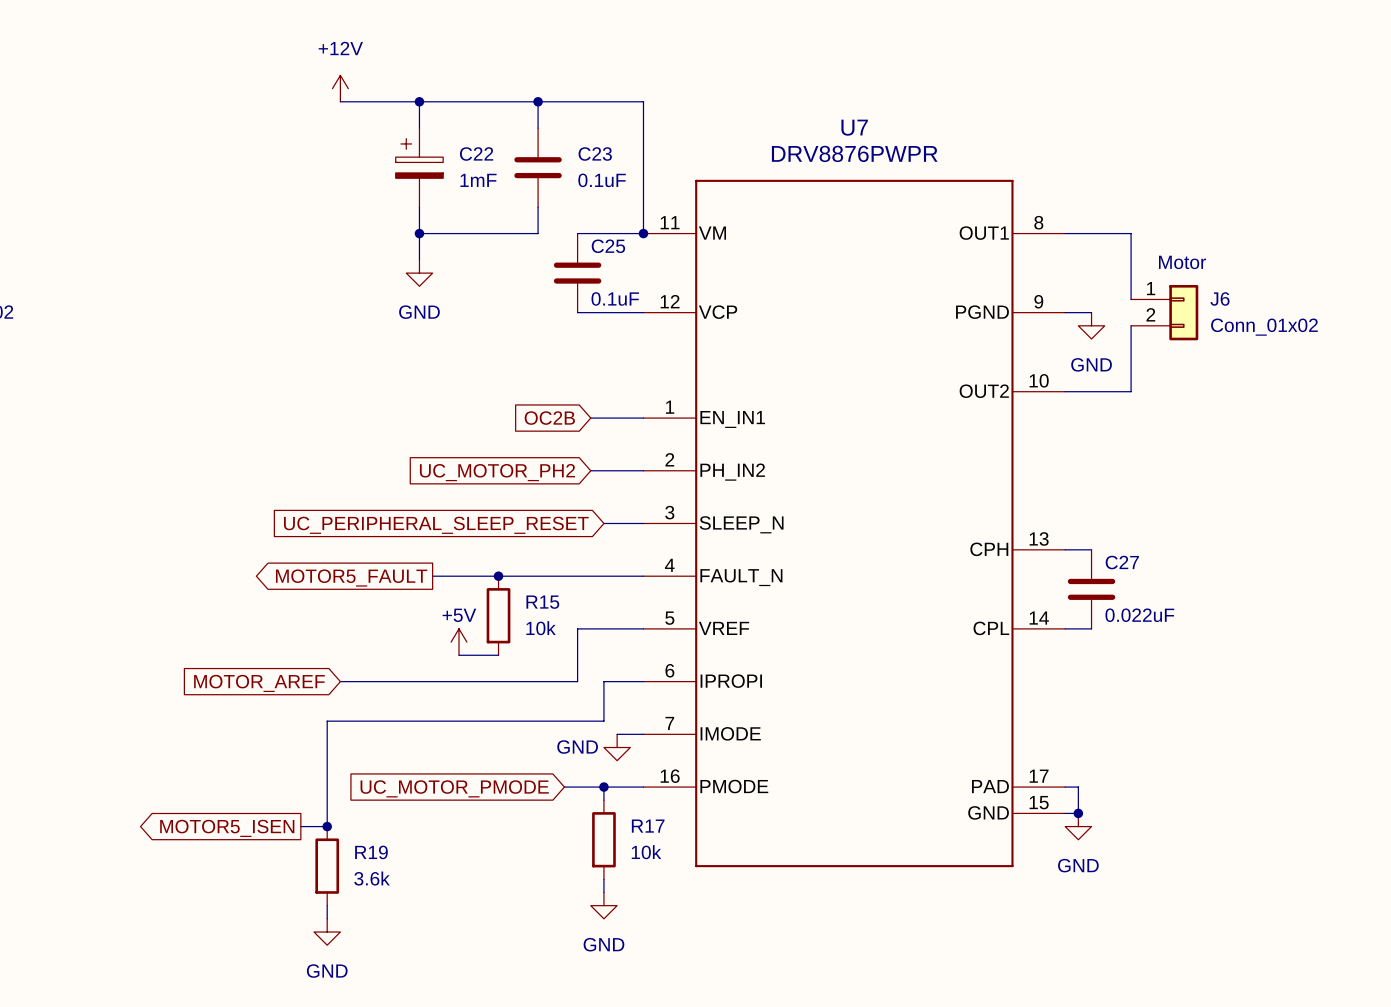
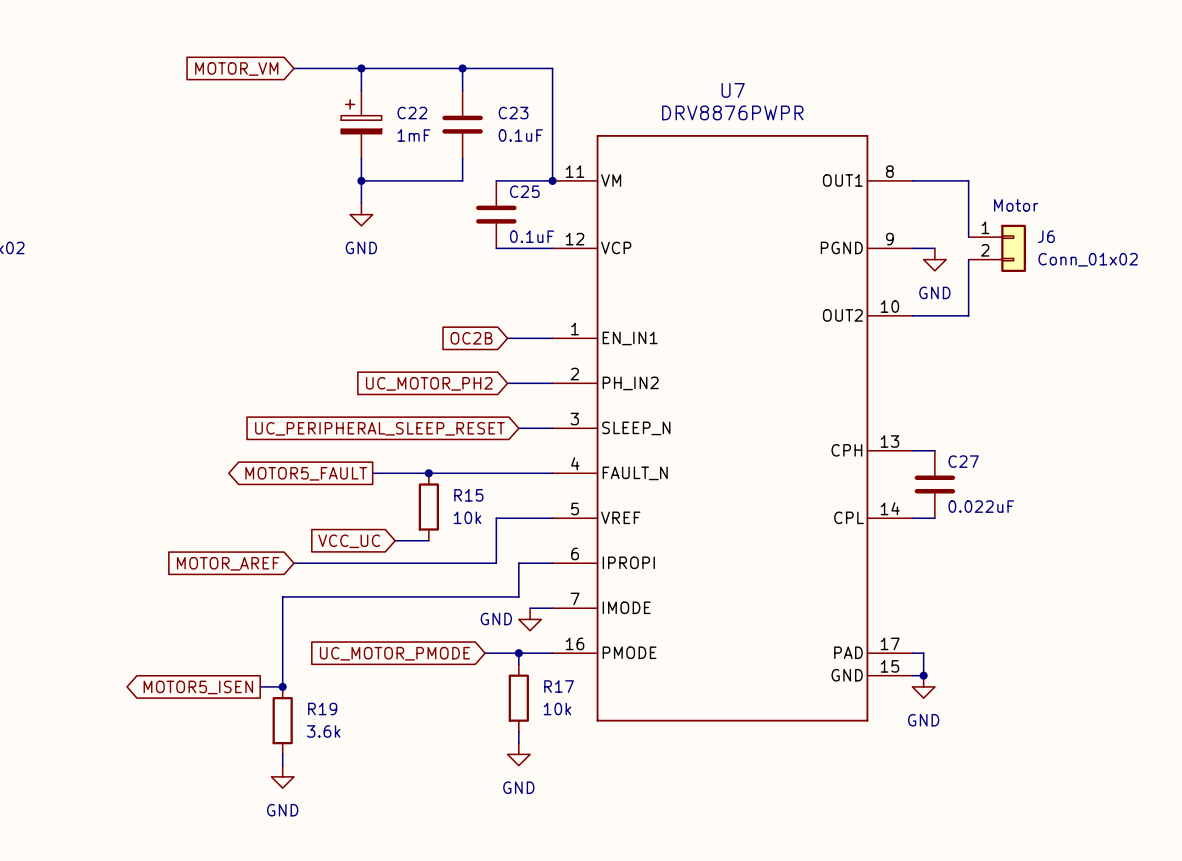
power symbol: +12V (340, 88) -> none
global label: none -> MOTOR_VM (236, 68)
power symbol: +5V (458, 642) -> none
global label: none -> VCC_UC (349, 541)

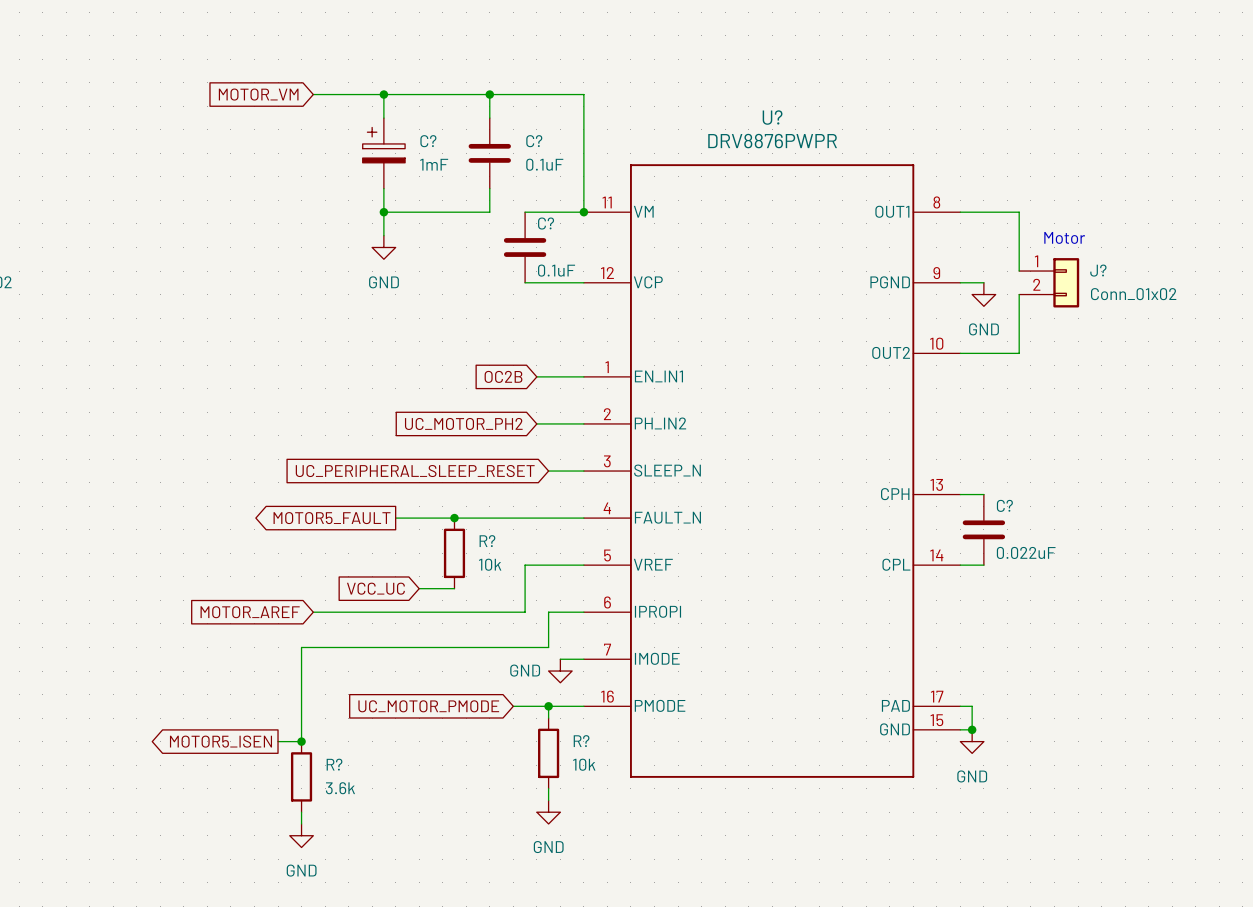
U7 name: U7 (733, 90) -> U? (772, 117)
C22 name: C22 (412, 113) -> C? (428, 141)
C23 name: C23 (513, 113) -> C? (534, 141)
C25 name: C25 (524, 191) -> C? (546, 223)
J6 name: J6 (1046, 236) -> J? (1098, 270)
C27 name: C27 (963, 461) -> C? (1004, 505)
R15 name: R15 (468, 495) -> R? (487, 541)
R17 name: R17 (559, 686) -> R? (581, 741)
R19 name: R19 (322, 708) -> R? (334, 764)

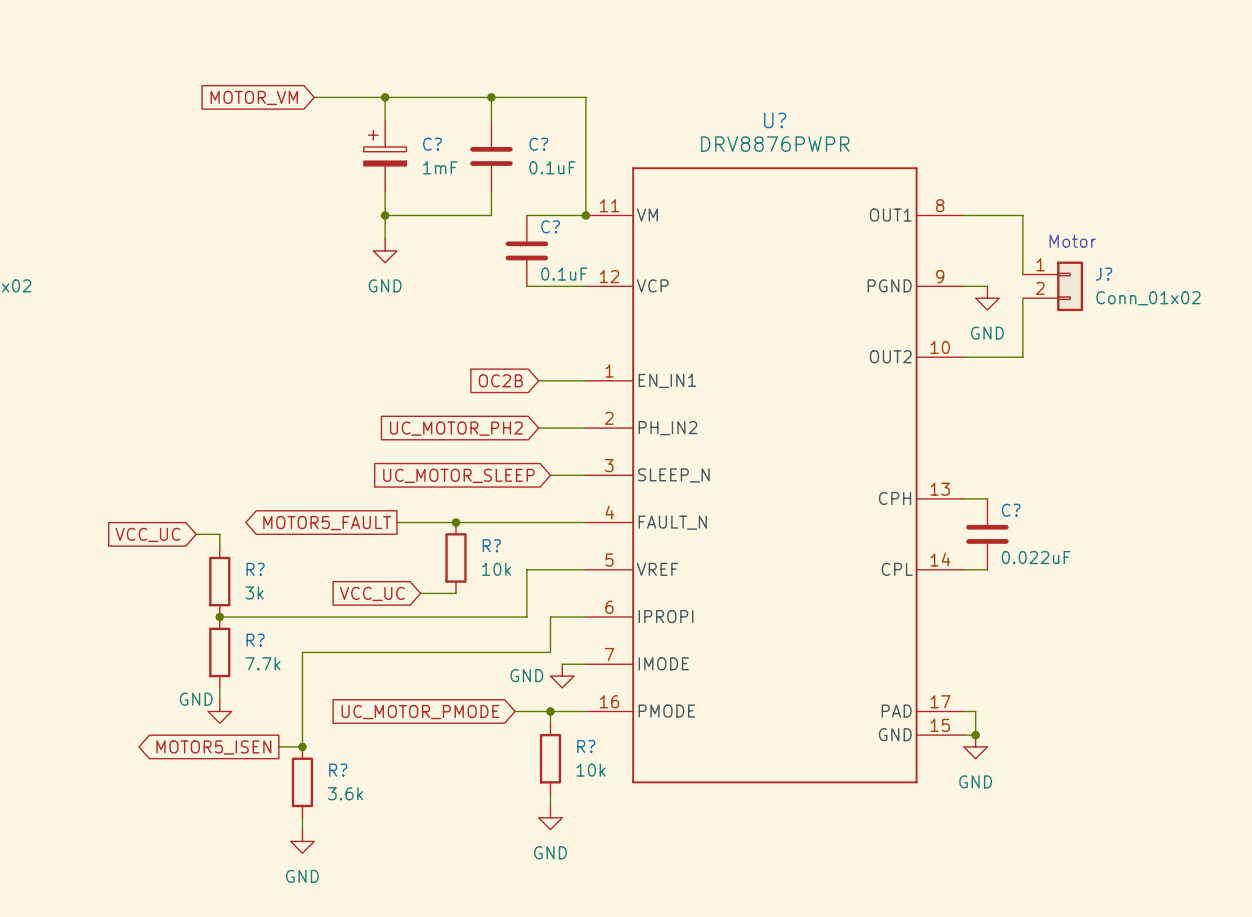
global label: UC_PERIPHERAL_SLEEP_RESET (415, 471) -> UC_MOTOR_SLEEP (458, 475)
global label: none -> VCC_UC (147, 534)
wire: none -> (196, 534) (219, 534) (219, 546)
R?: none -> 3k (219, 581)
wire: none -> (219, 617) (314, 617)
junction: none -> (219, 617)
global label: MOTOR_AREF (250, 612) -> none
R?: none -> 7.7k (219, 652)
wire: none -> (219, 687) (219, 699)
power symbol: none -> GND (219, 711)

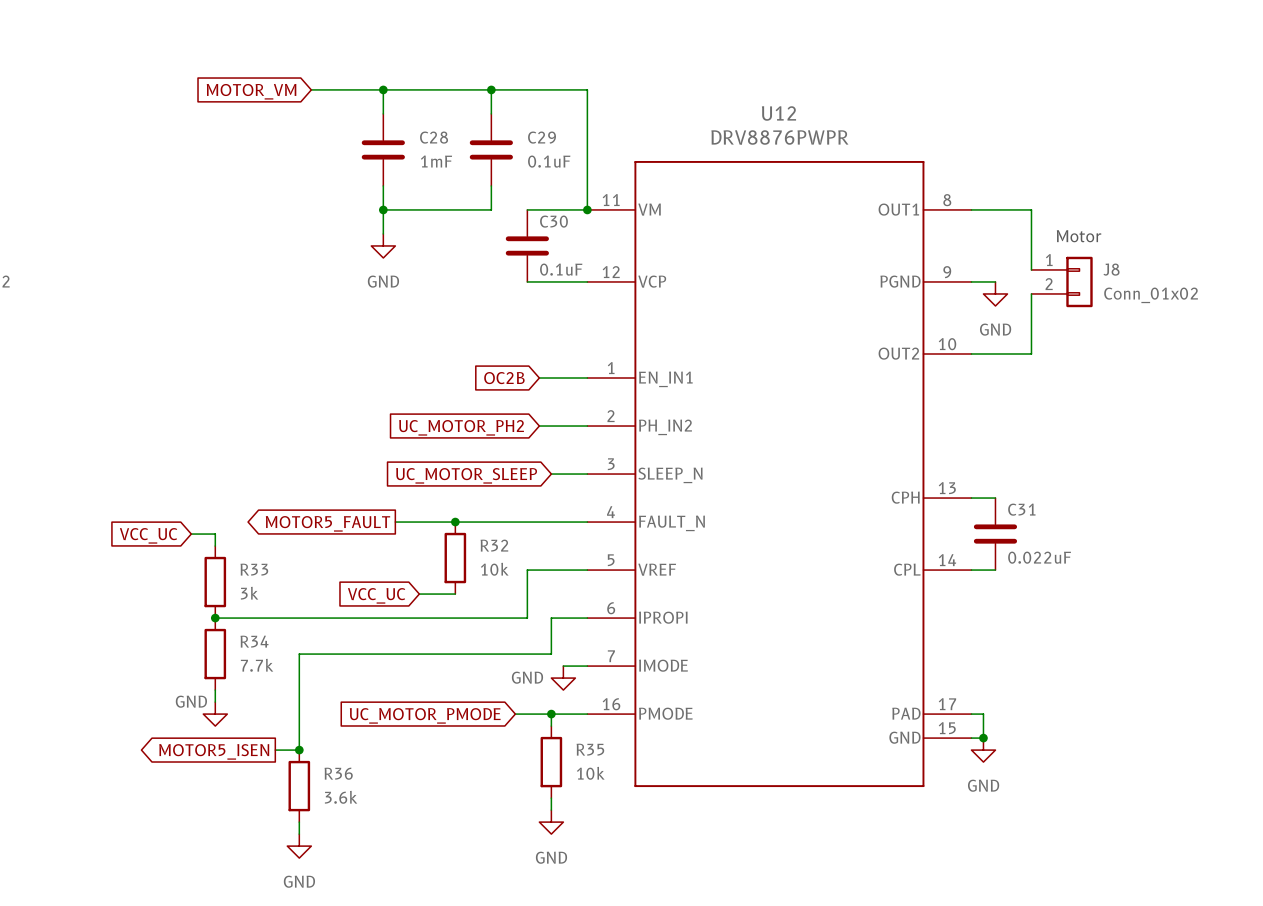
U? name: U? (775, 120) -> U12 (778, 113)
C? name: C? (538, 144) -> C29 (542, 137)
C?: 1mF (385, 156) -> none
C28: none -> 1mF (383, 149)
C? name: C? (550, 226) -> C30 (553, 221)
J? name: J? (1103, 274) -> J8 (1111, 269)
C? name: C? (1011, 510) -> C31 (1021, 509)
R? name: R? (491, 545) -> R32 (494, 545)
R? name: R? (255, 569) -> R33 (254, 569)
R? name: R? (255, 640) -> R34 (254, 641)
R? name: R? (586, 746) -> R35 (590, 749)
R? name: R? (338, 770) -> R36 (338, 773)

